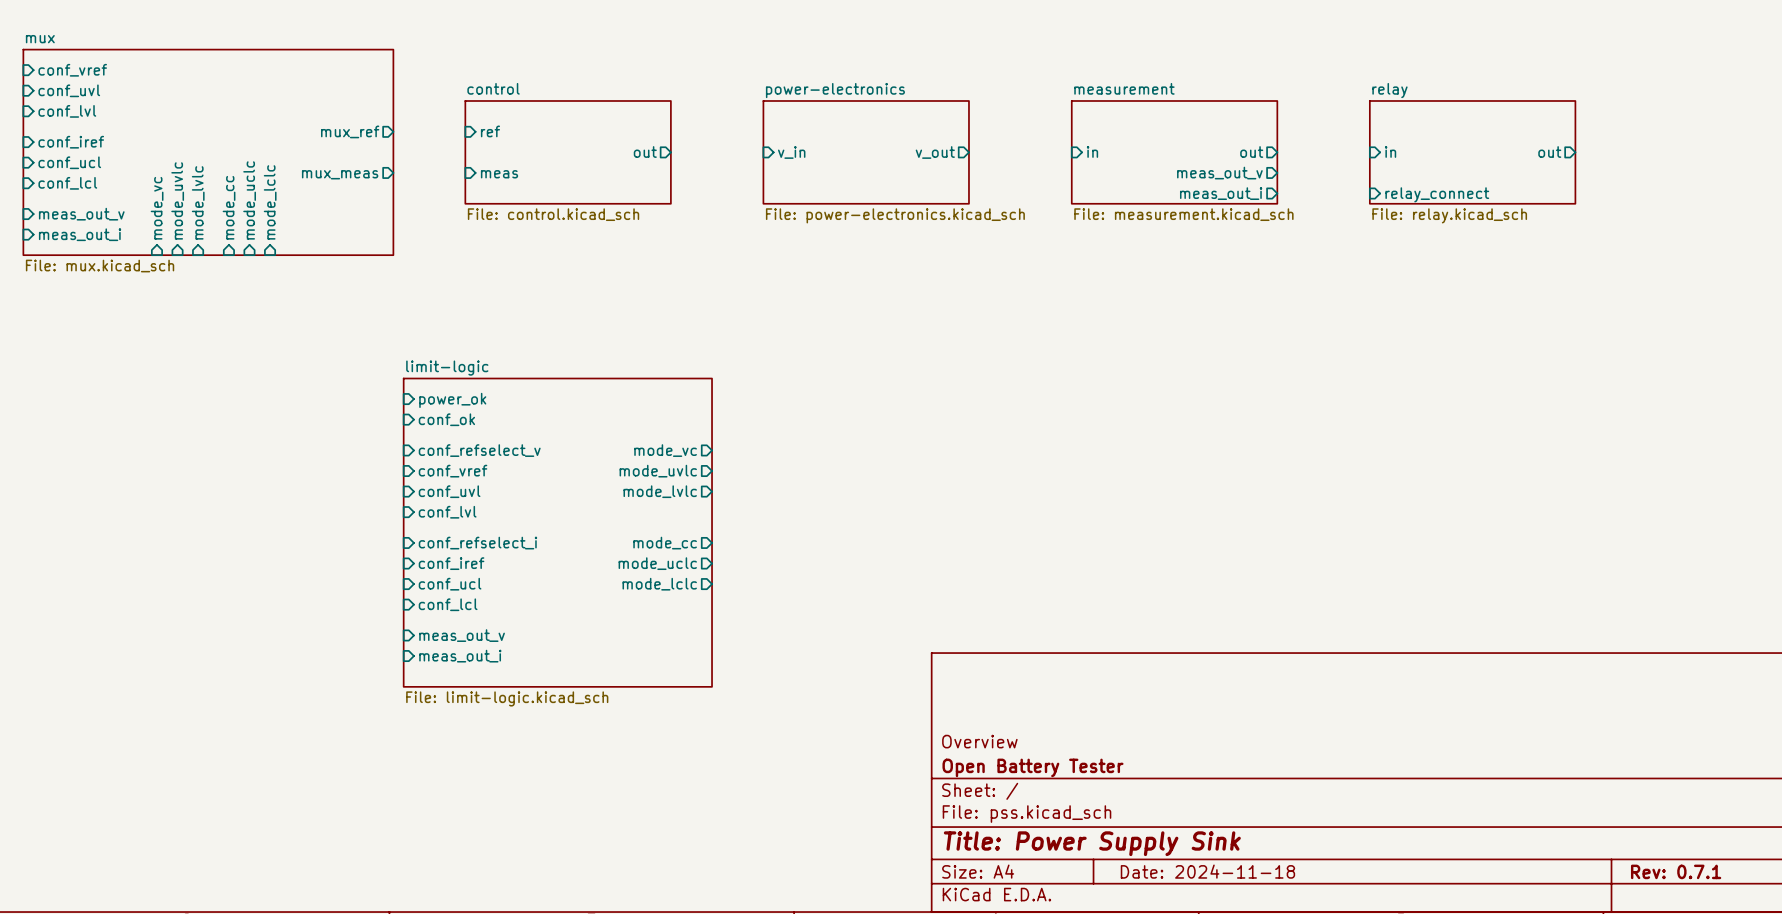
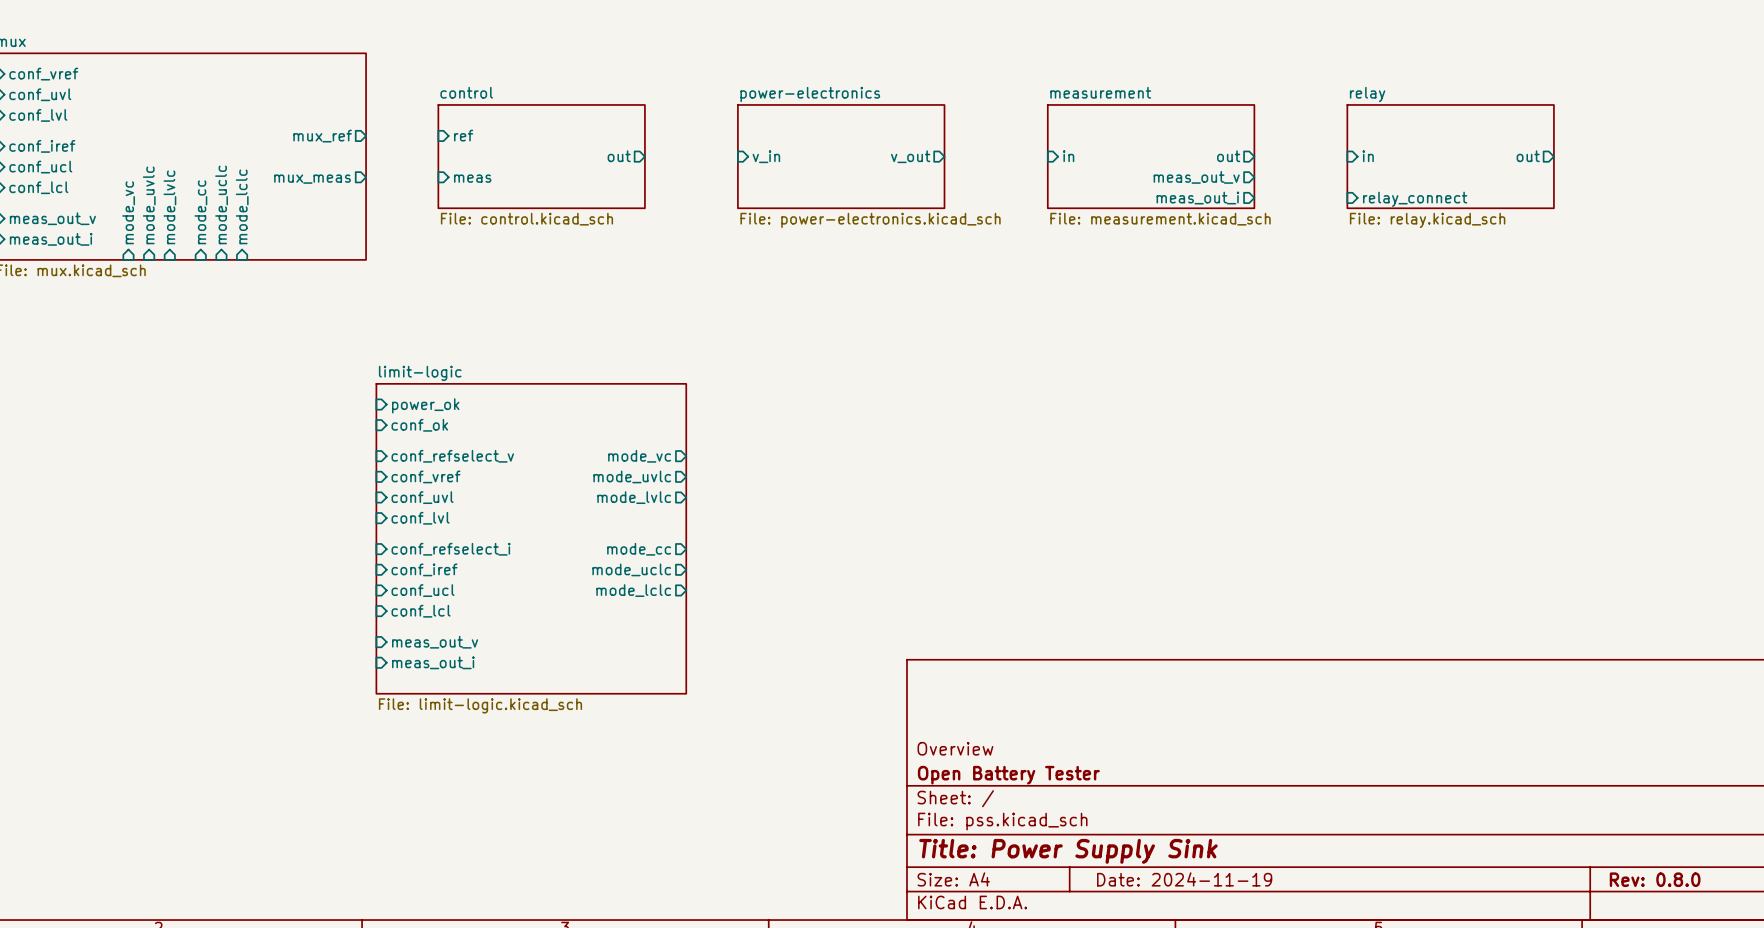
title block: Date: 2024-11-18 (1207, 871) -> Date: 2024-11-19 (1184, 879)
title block: Rev: 0.7.1 (1676, 871) -> Rev: 0.8.0 (1655, 879)

